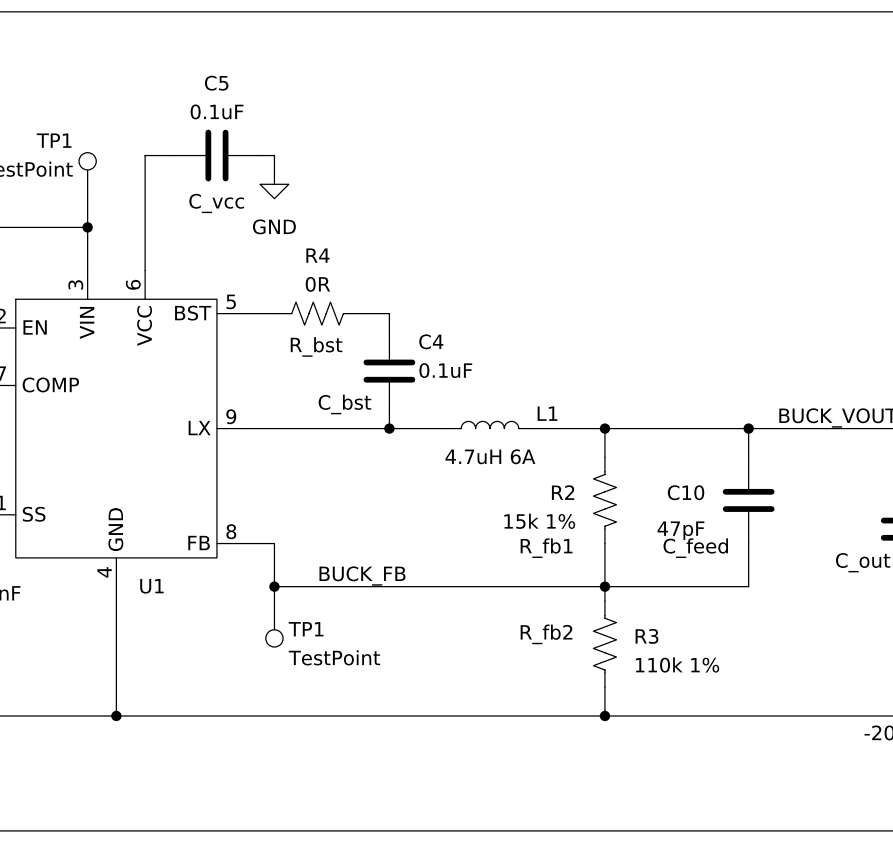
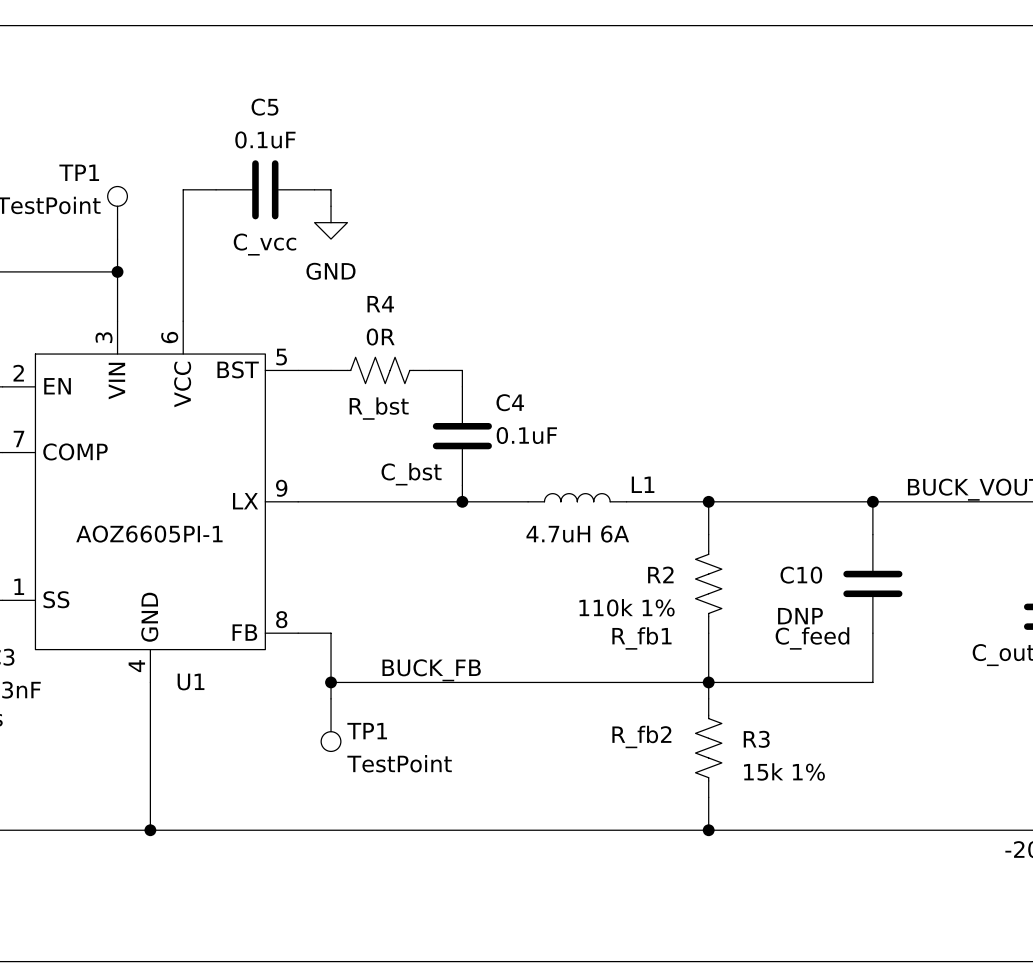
U1 value: none -> AOZ6605PI-1 (149, 534)
R2 value: 15k 1% (539, 521) -> 110k 1% (627, 607)
C10 value: 47pF (680, 530) -> DNP (800, 616)
R3 value: 110k 1% (677, 664) -> 15k 1% (784, 771)

